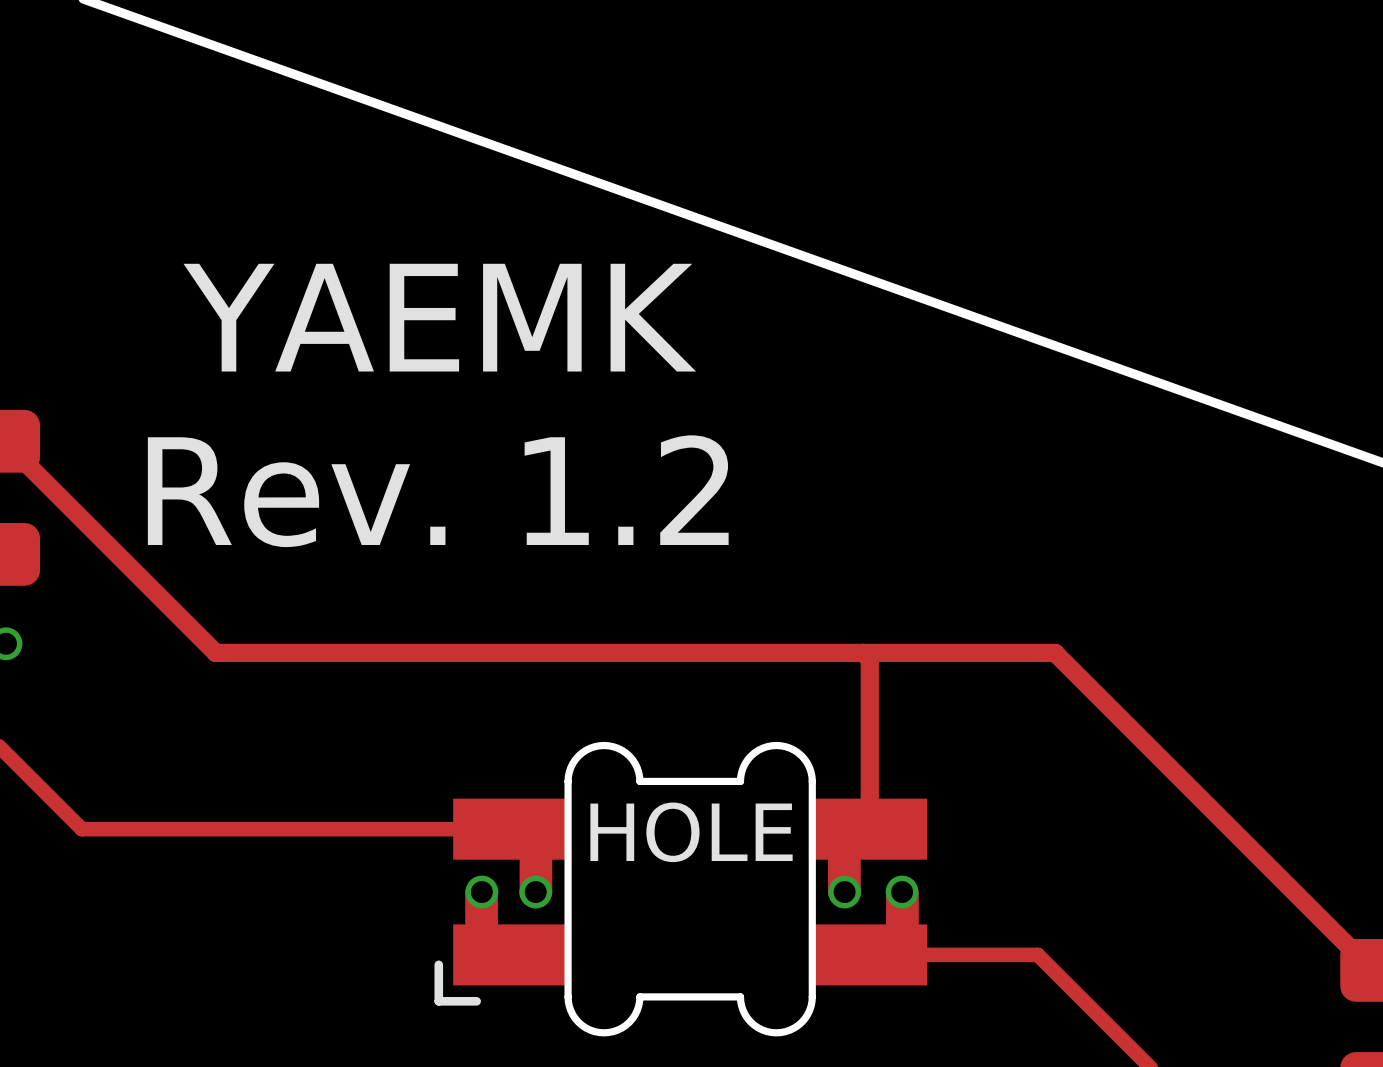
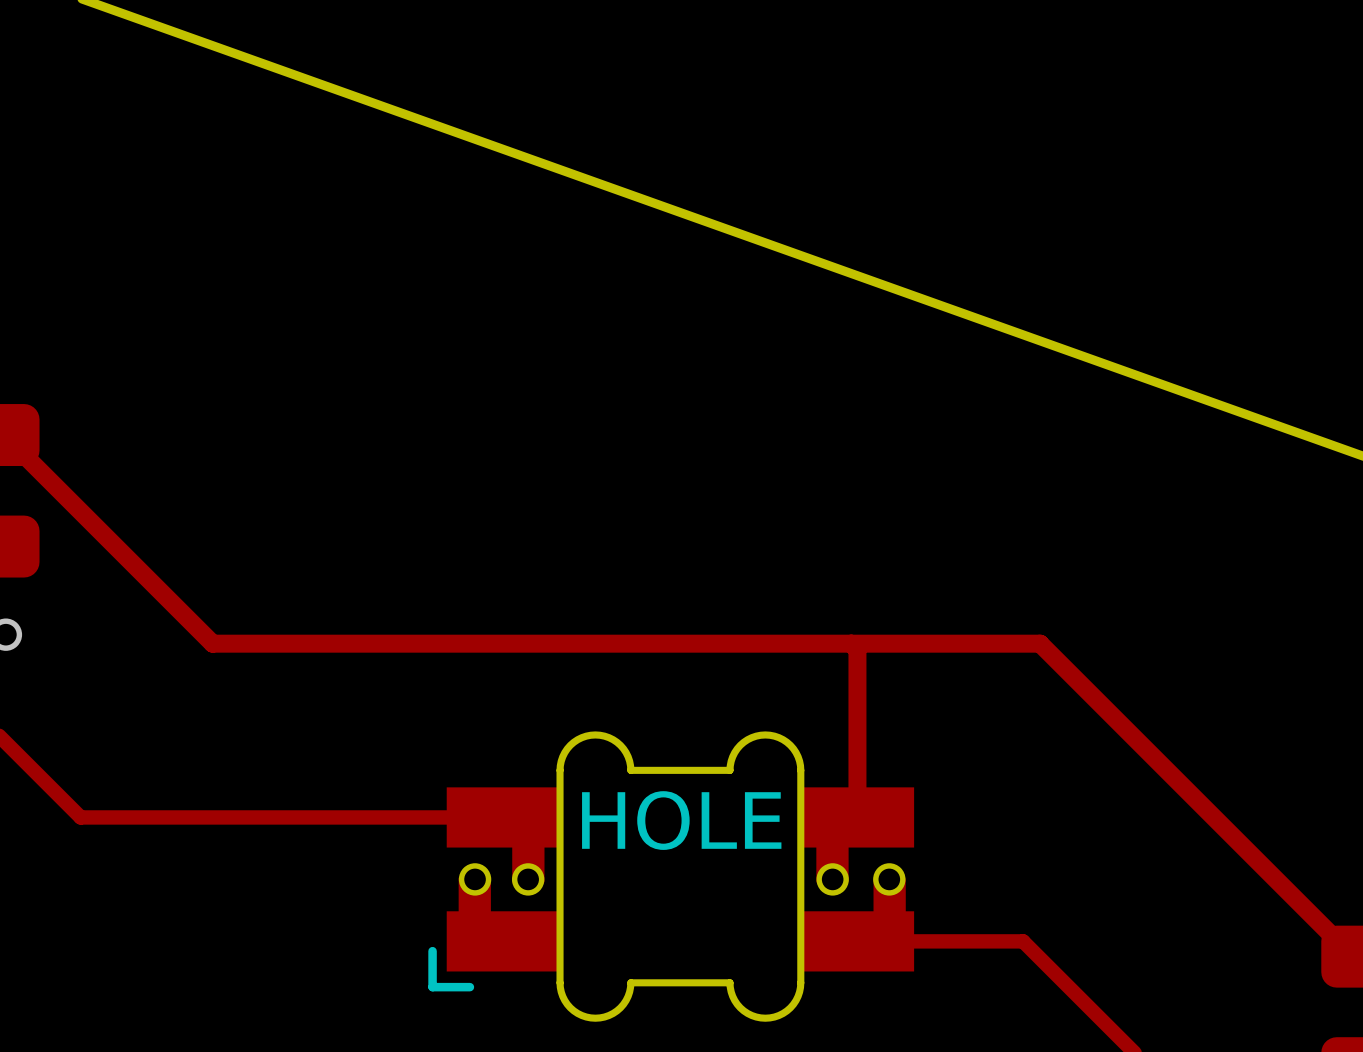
text: YAEMK (439, 317) -> none
text: Rev. 1.2 (438, 491) -> none

